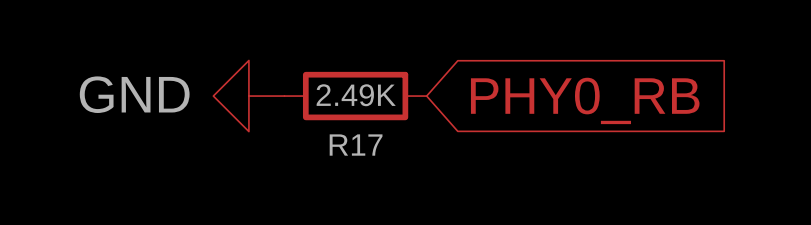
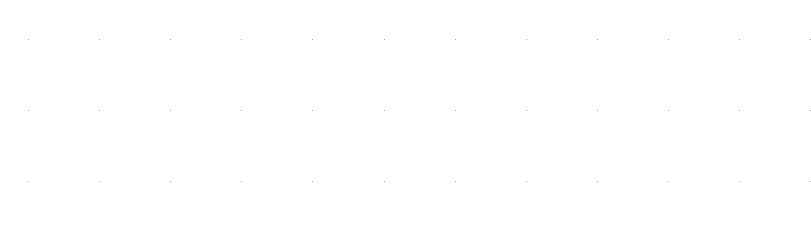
power symbol: GND (248, 96) -> none
R17: 2.49K (355, 96) -> none
global label: PHY0_RB (585, 100) -> none

